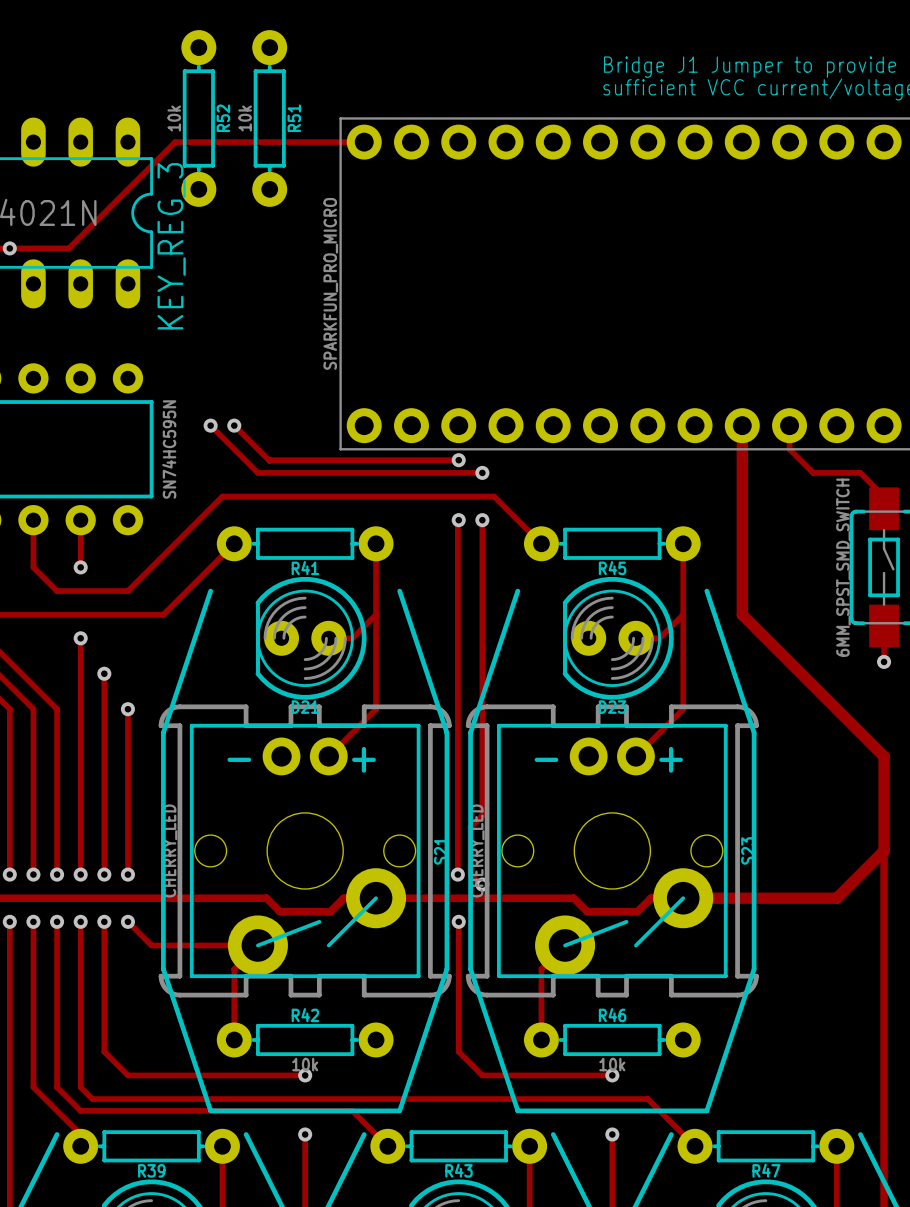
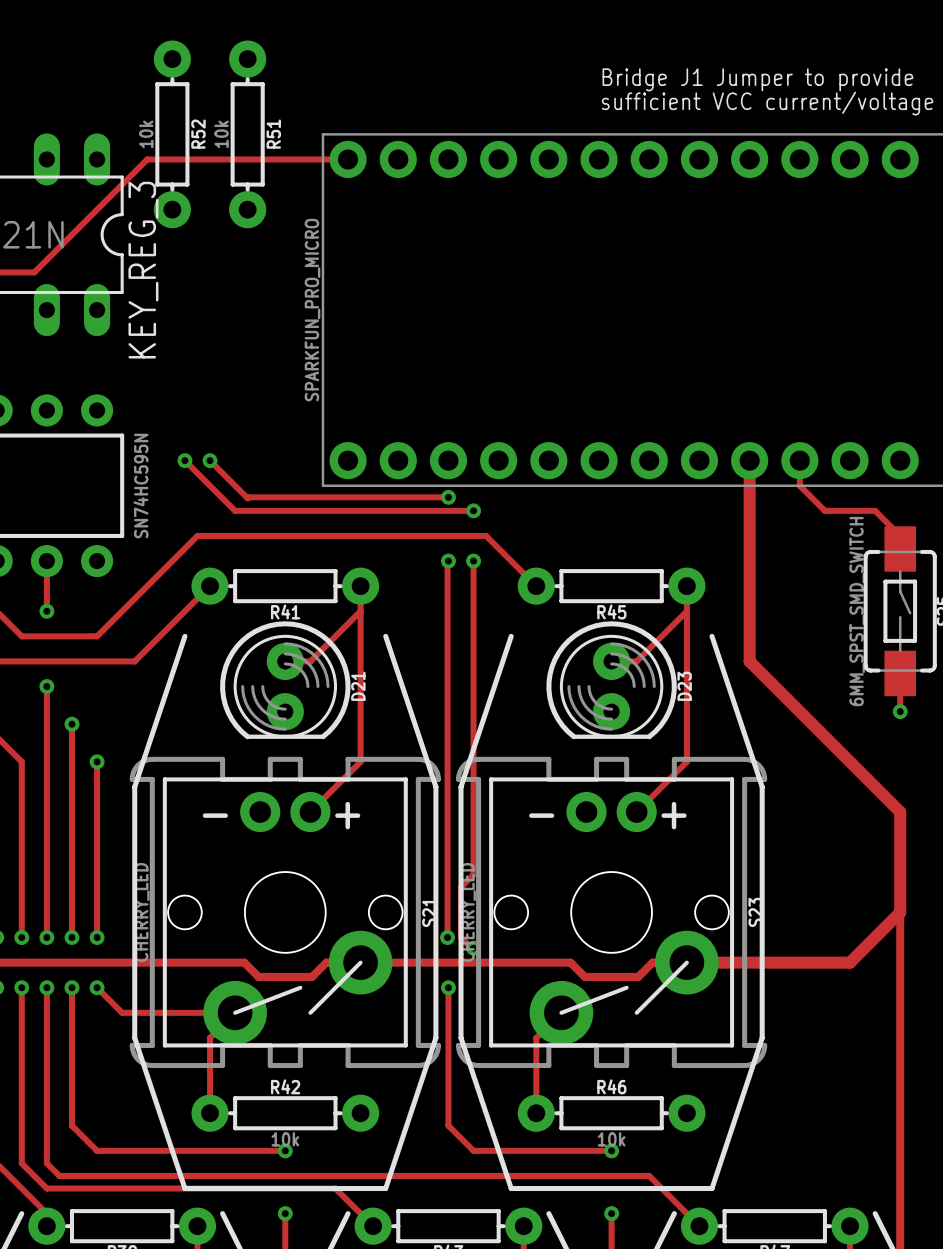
track: none -> (360, 611) (310, 661) (285, 661)
track: none -> (686, 611) (636, 661) (611, 661)
track: (376, 614) (352, 638) (328, 638) -> none
track: (683, 614) (659, 638) (635, 638) -> none
D21 rotation: 0° (311, 638) -> 90° counterclockwise (285, 680)
D23 rotation: 0° (618, 638) -> 90° counterclockwise (611, 680)

